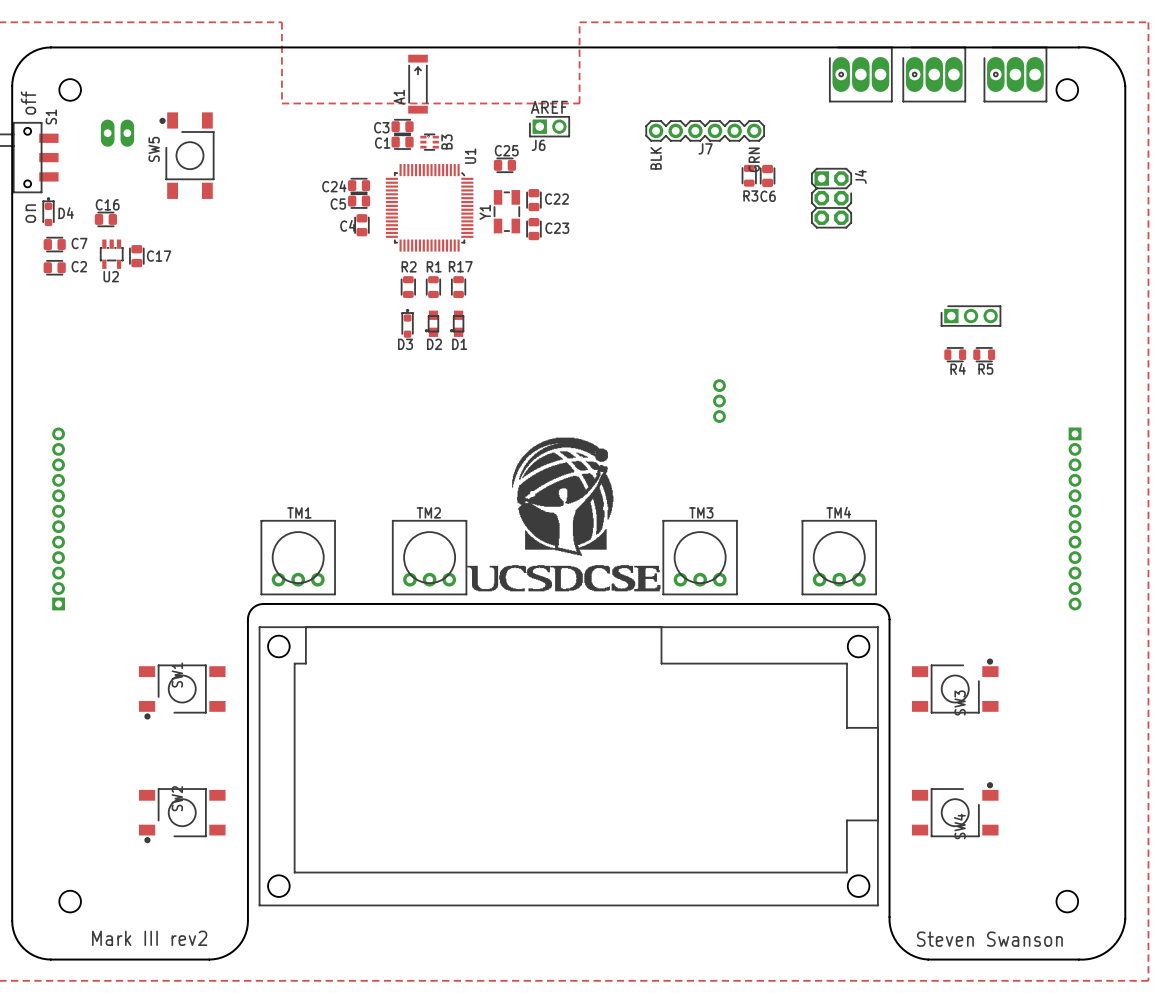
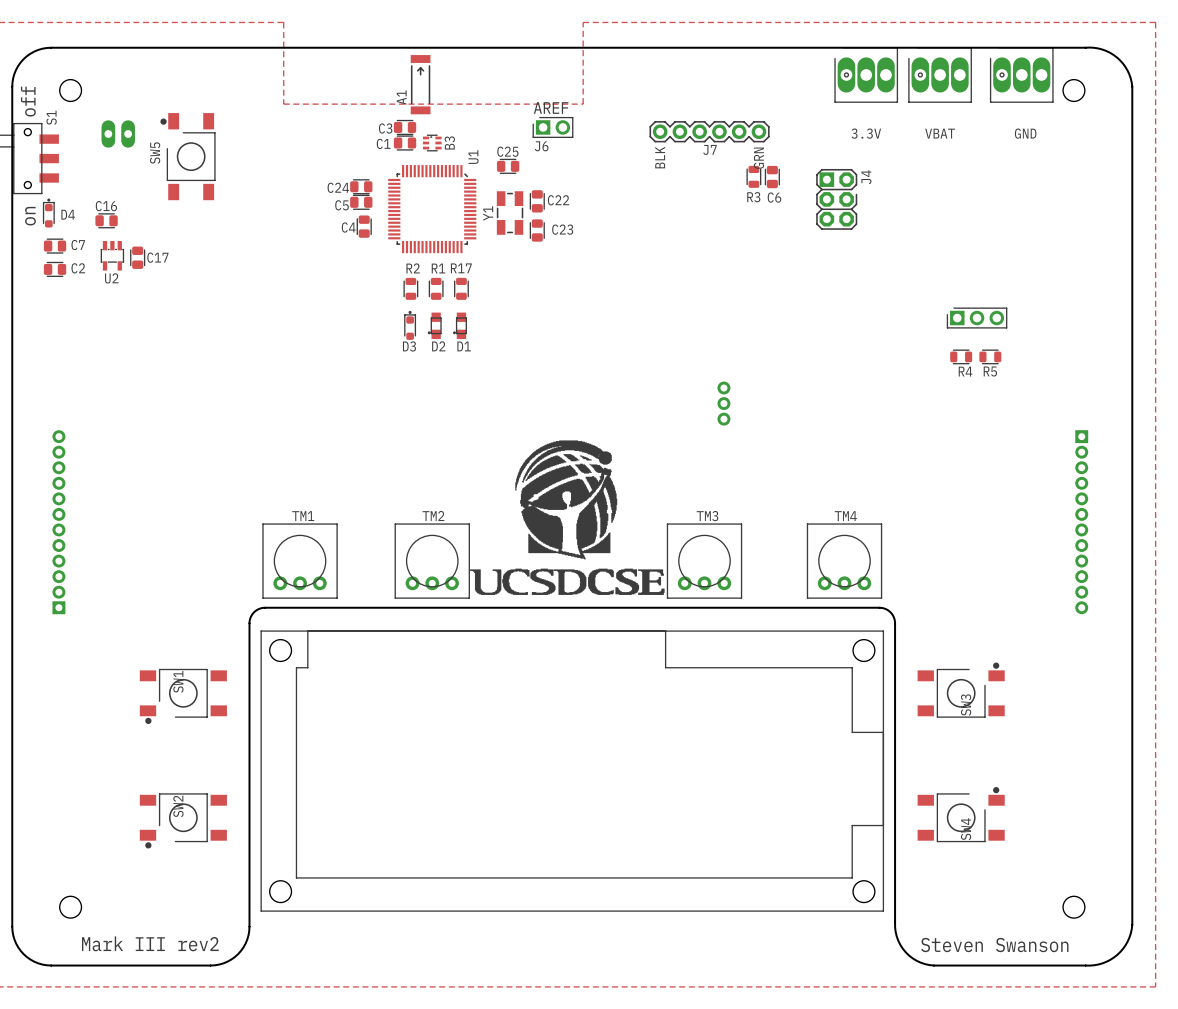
3.3V name: none -> 3.3V (866, 133)
VBAT name: none -> VBAT (940, 133)
GND name: none -> GND (1025, 133)

